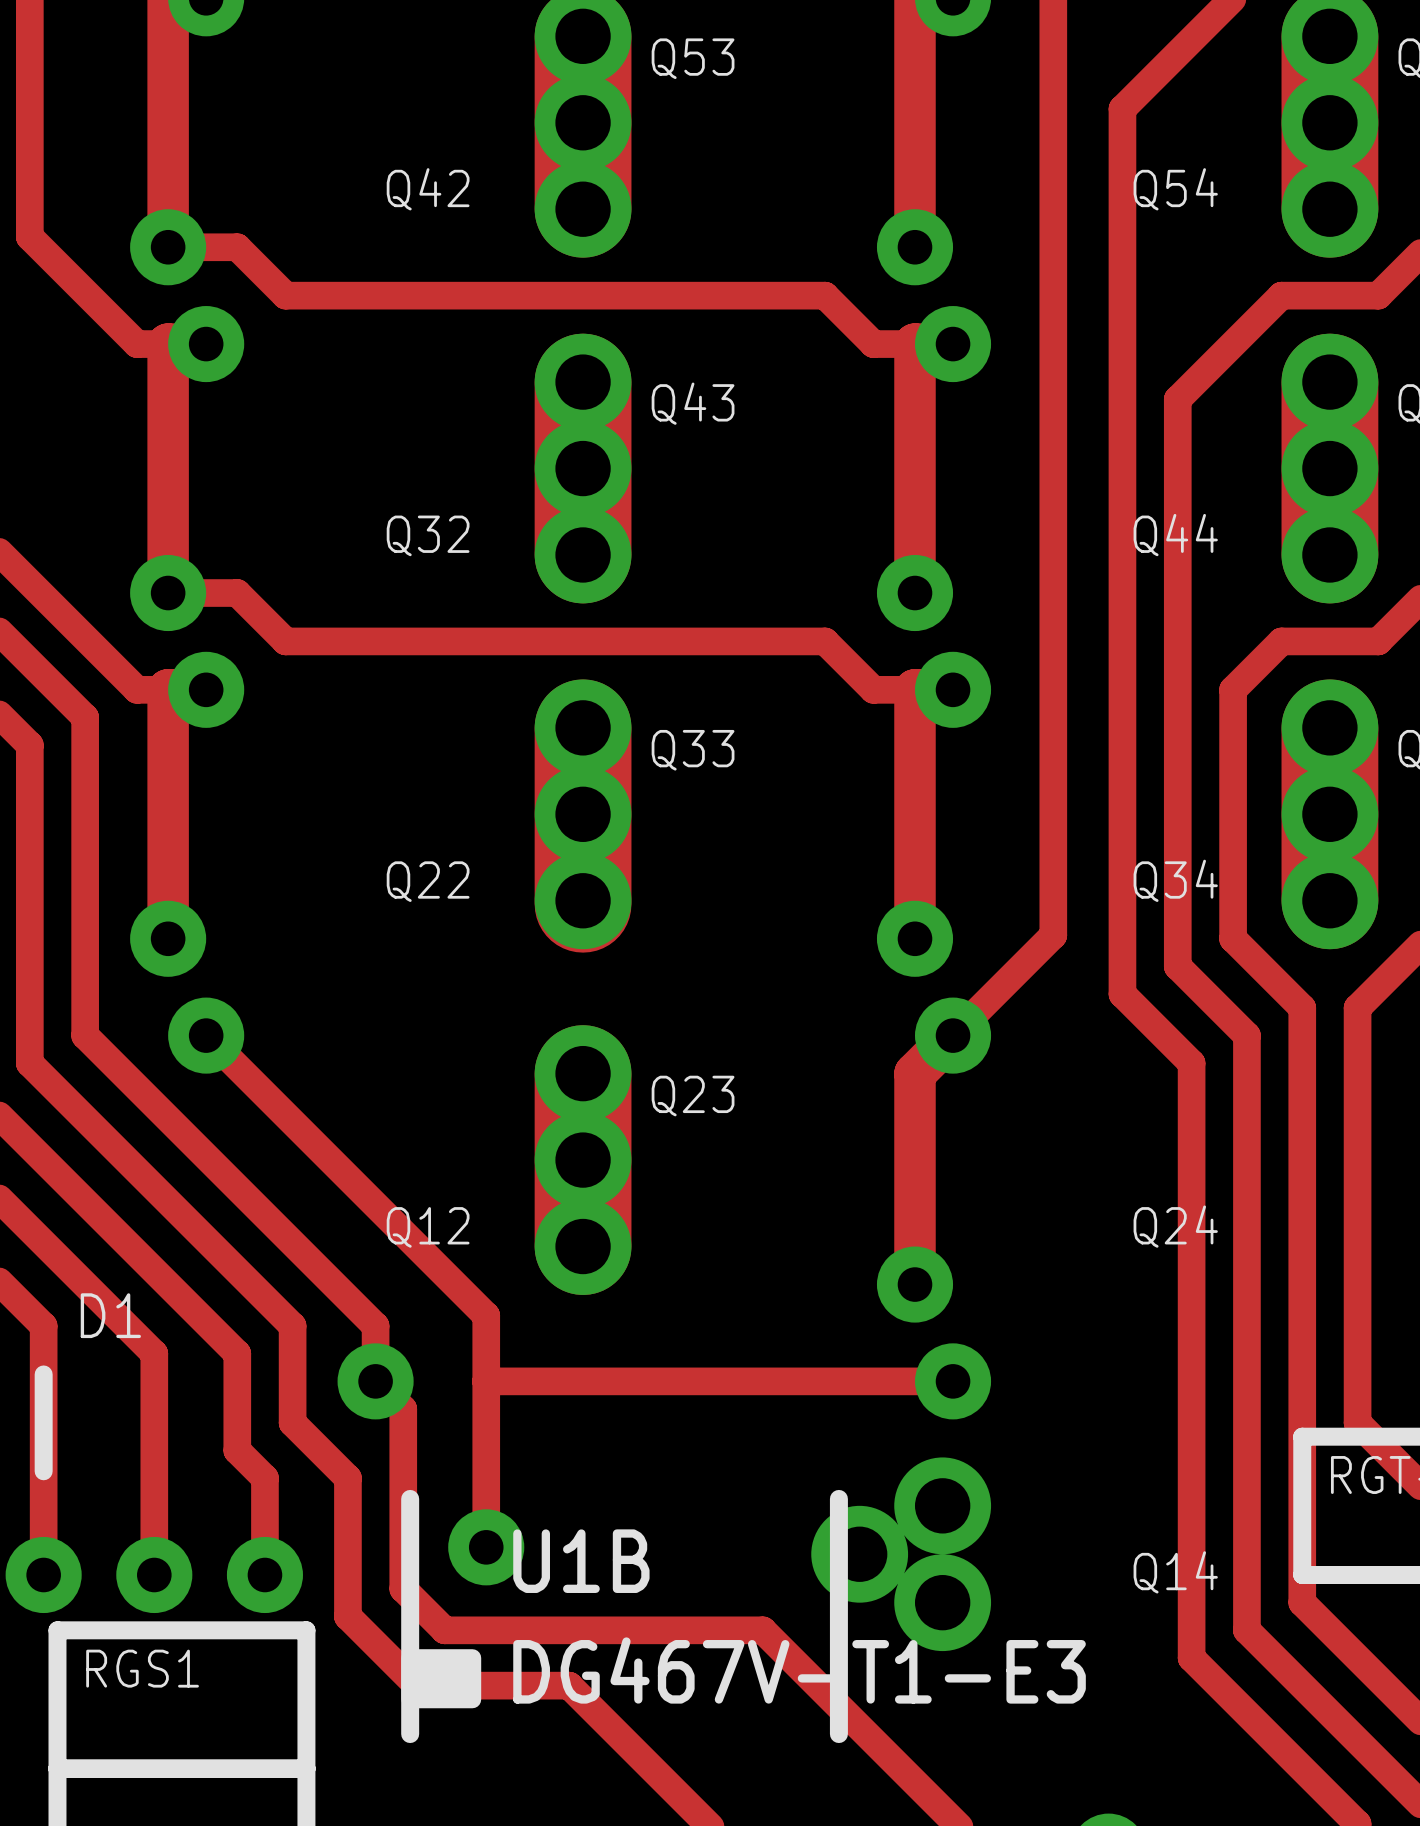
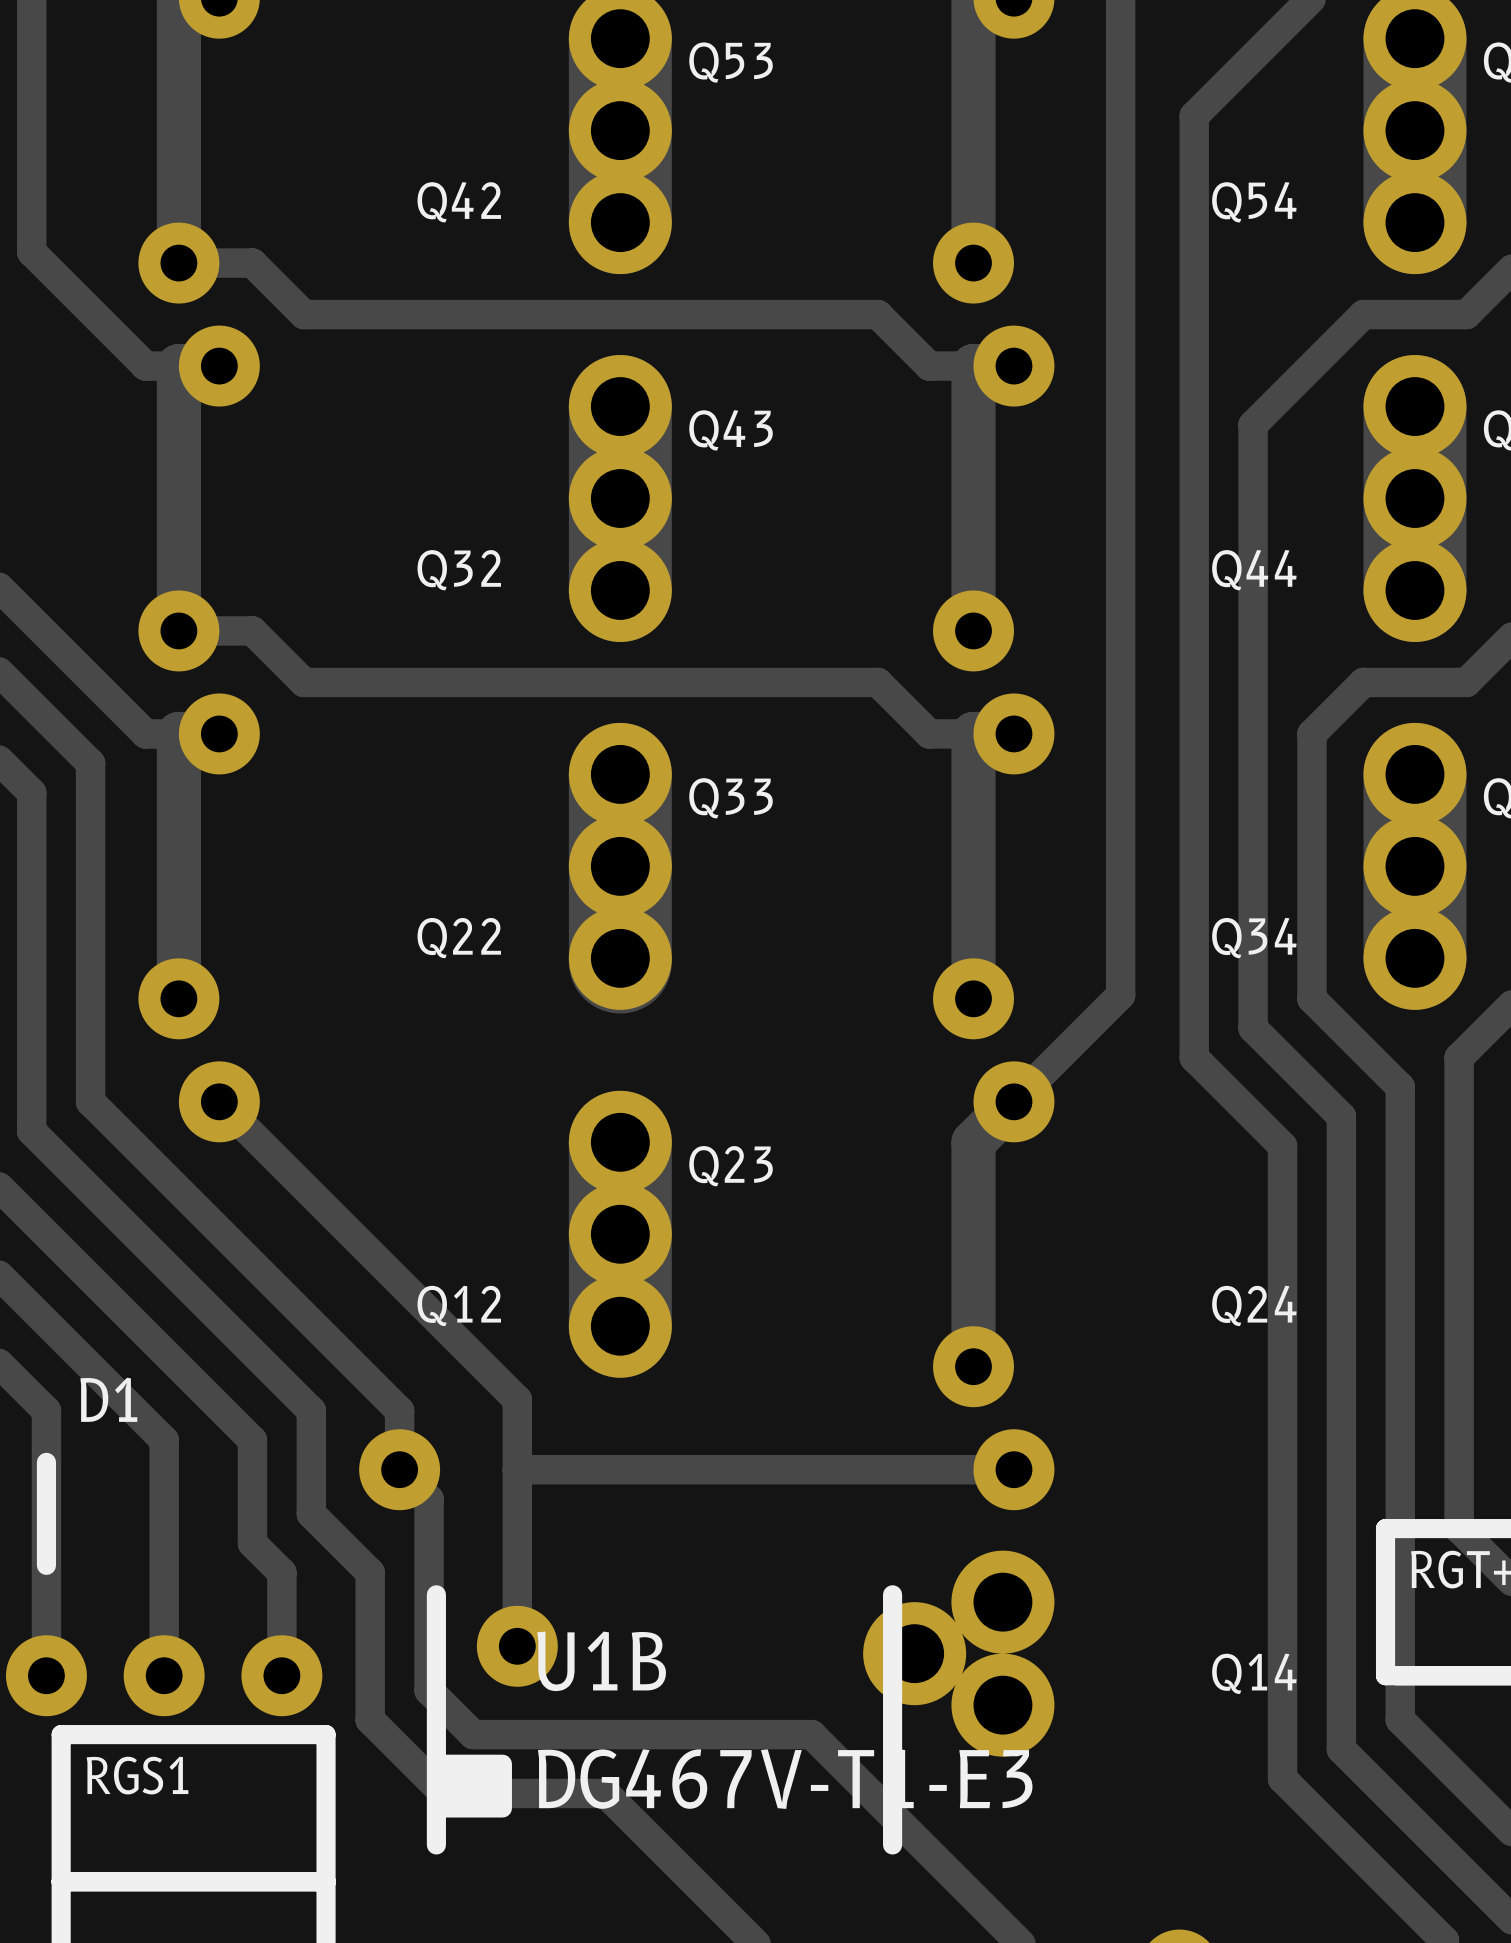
track: (1371, 994) (1357, 1007) (1357, 1422) (1371, 1436) -> (1459, 1057) (1459, 1528)
track: (1302, 1007) (1302, 1602) (1316, 1616) -> (1385, 1072) (1400, 1087) (1400, 1719)
track: (1246, 1035) (1246, 1630) (1260, 1644) -> (1326, 1101) (1341, 1116) (1341, 1749)
track: (1191, 1063) (1191, 1657) (1205, 1671) -> (1267, 1131) (1282, 1145) (1282, 1778)

